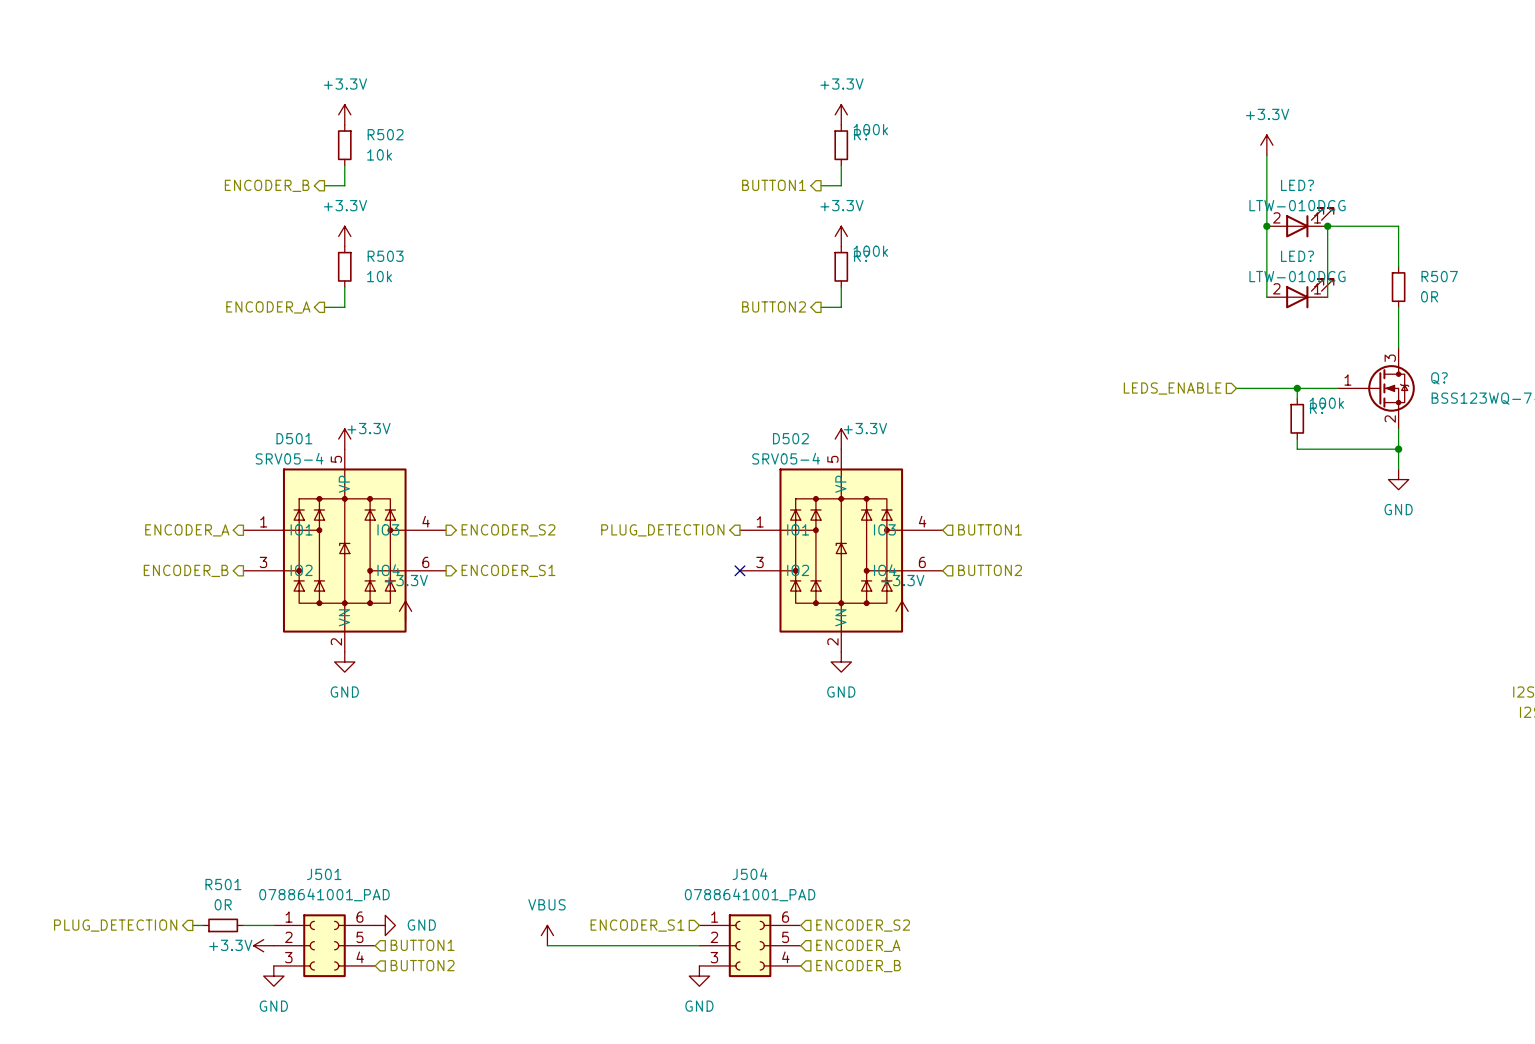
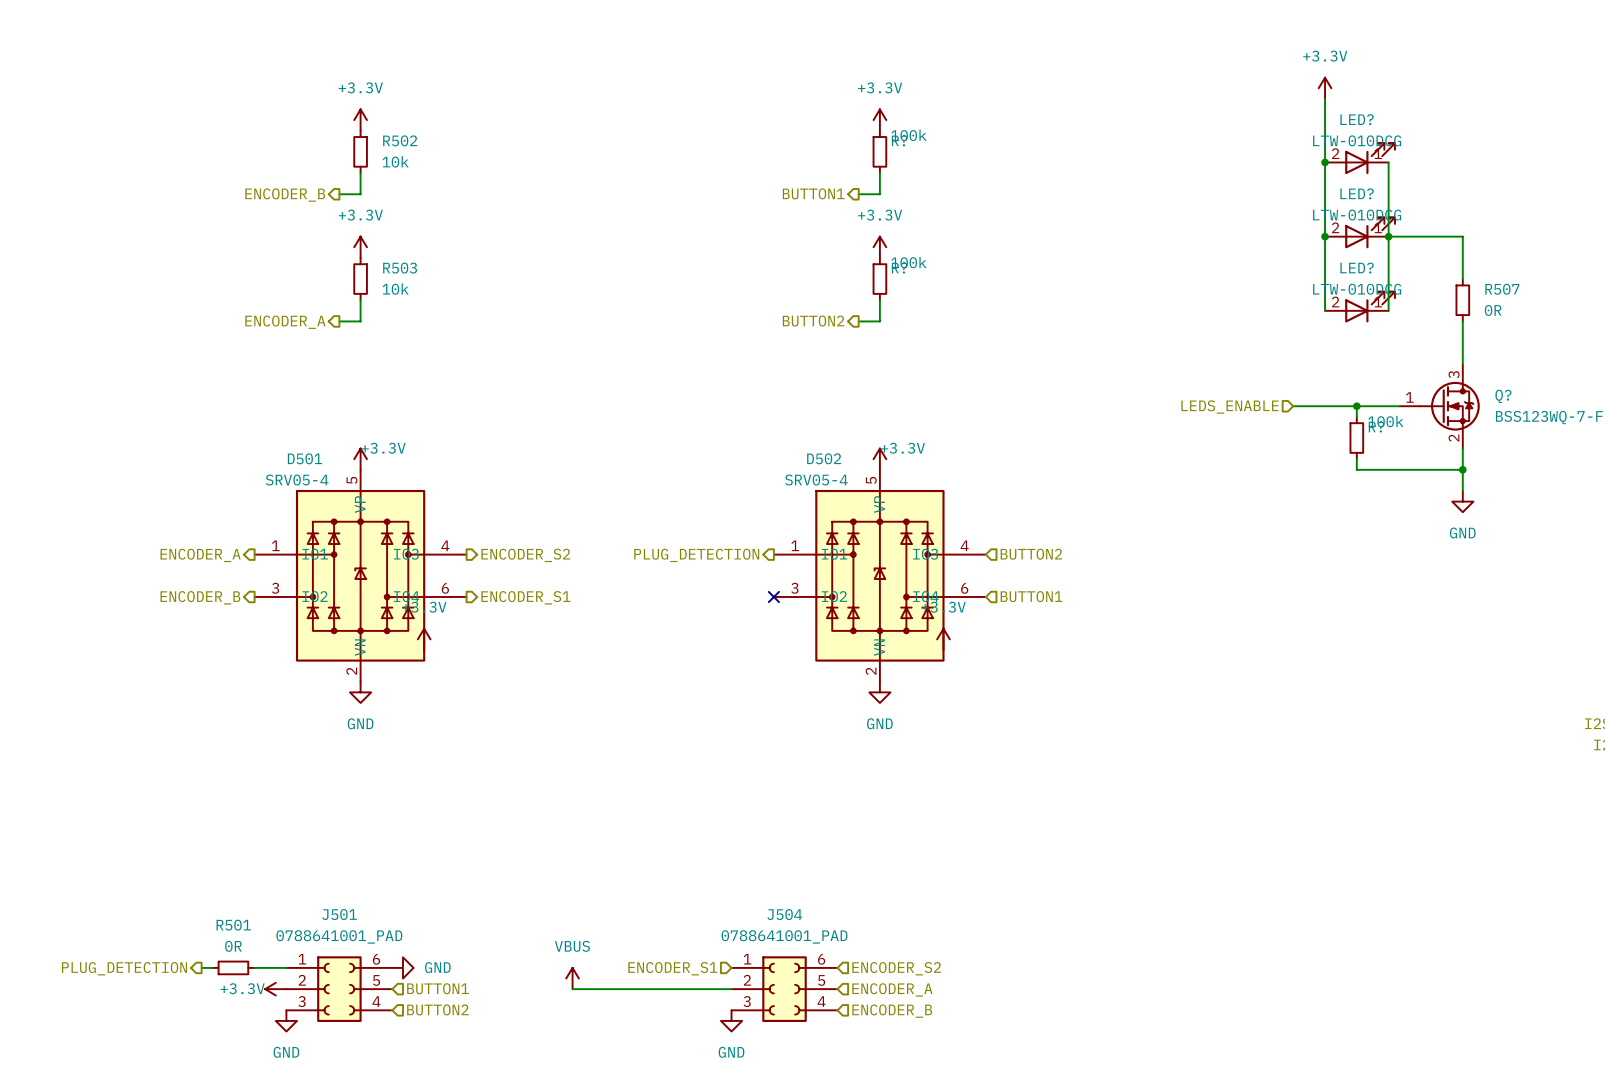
wire: none -> (1325, 98) (1325, 162)
power symbol position: +3.3V (1266, 145) -> +3.3V (1325, 88)
LED?: none -> (1360, 158)
junction: none -> (1325, 162)
wire: none -> (1388, 162) (1388, 236)
hierarchical label: BUTTON1 (990, 529) -> BUTTON2 (1031, 554)
hierarchical label: BUTTON2 (990, 570) -> BUTTON1 (1031, 596)

